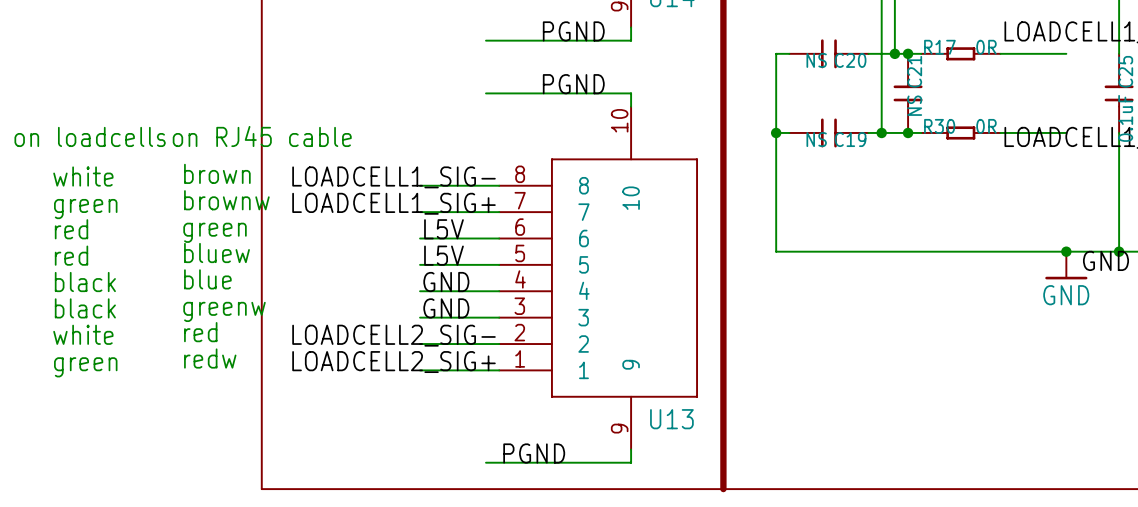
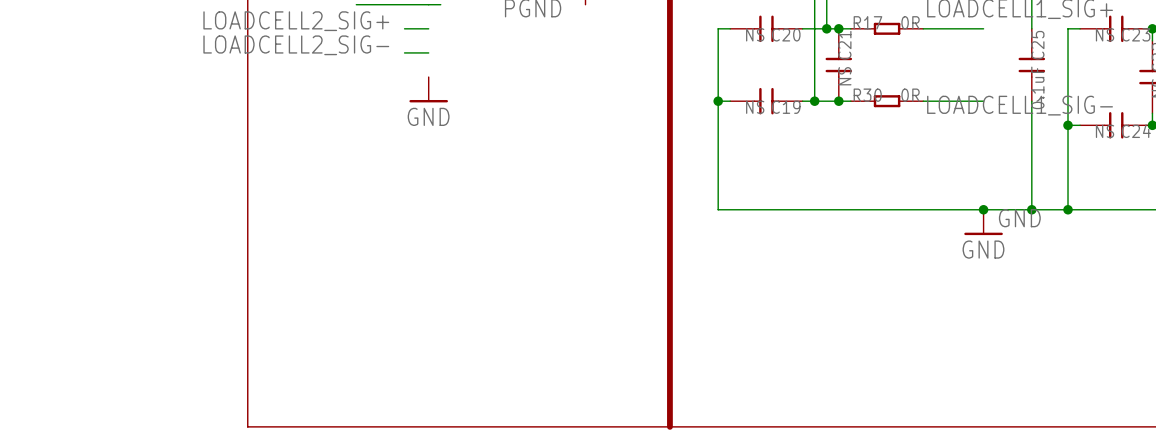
wire: none -> (356, 4) (440, 4)
wire: (631, 27) (631, 40) (486, 40) -> none
label: none -> LOADCELL2_SIG+ (296, 21)
wire: none -> (404, 28) (428, 28)
label: none -> LOADCELL2_SIG- (296, 45)
wire: none -> (404, 52) (428, 52)
label: PGND (573, 84) -> none
wire: (486, 93) (631, 93) (631, 106) -> none
power symbol: none -> GND (428, 89)
text: on loadcells (90, 136) -> none
text: on RJ45 cable (262, 136) -> none
text: brown (217, 173) -> none
text: white (83, 176) -> none
label: LOADCELL1_SIG- (393, 177) -> none
wire: (420, 185) (499, 185) -> none
text: brownw (226, 200) -> none
label: LOADCELL1_SIG+ (393, 203) -> none
text: green (85, 209) -> none
wire: (420, 212) (499, 212) -> none
text: red (71, 229) -> none
label: L5V (443, 229) -> none
text: green (215, 232) -> none
wire: (420, 238) (499, 238) -> none
text: bluew (216, 253) -> none
text: red (71, 255) -> none
label: L5V (443, 255) -> none
wire: (420, 264) (499, 264) -> none
U13: (598, 278) -> none
text: blue (207, 279) -> none
text: black (85, 282) -> none
label: GND (446, 282) -> none
wire: (420, 291) (499, 291) -> none
text: black (85, 308) -> none
label: GND (446, 308) -> none
text: greenw (224, 311) -> none
wire: (420, 317) (499, 317) -> none
text: red (200, 332) -> none
text: white (83, 334) -> none
label: LOADCELL2_SIG- (393, 335) -> none
wire: (420, 344) (499, 344) -> none
text: redw (210, 358) -> none
label: LOADCELL2_SIG+ (393, 362) -> none
text: green (85, 367) -> none
wire: (420, 370) (499, 370) -> none
wire: (631, 449) (631, 462) (486, 462) -> none
label: PGND (534, 453) -> none

